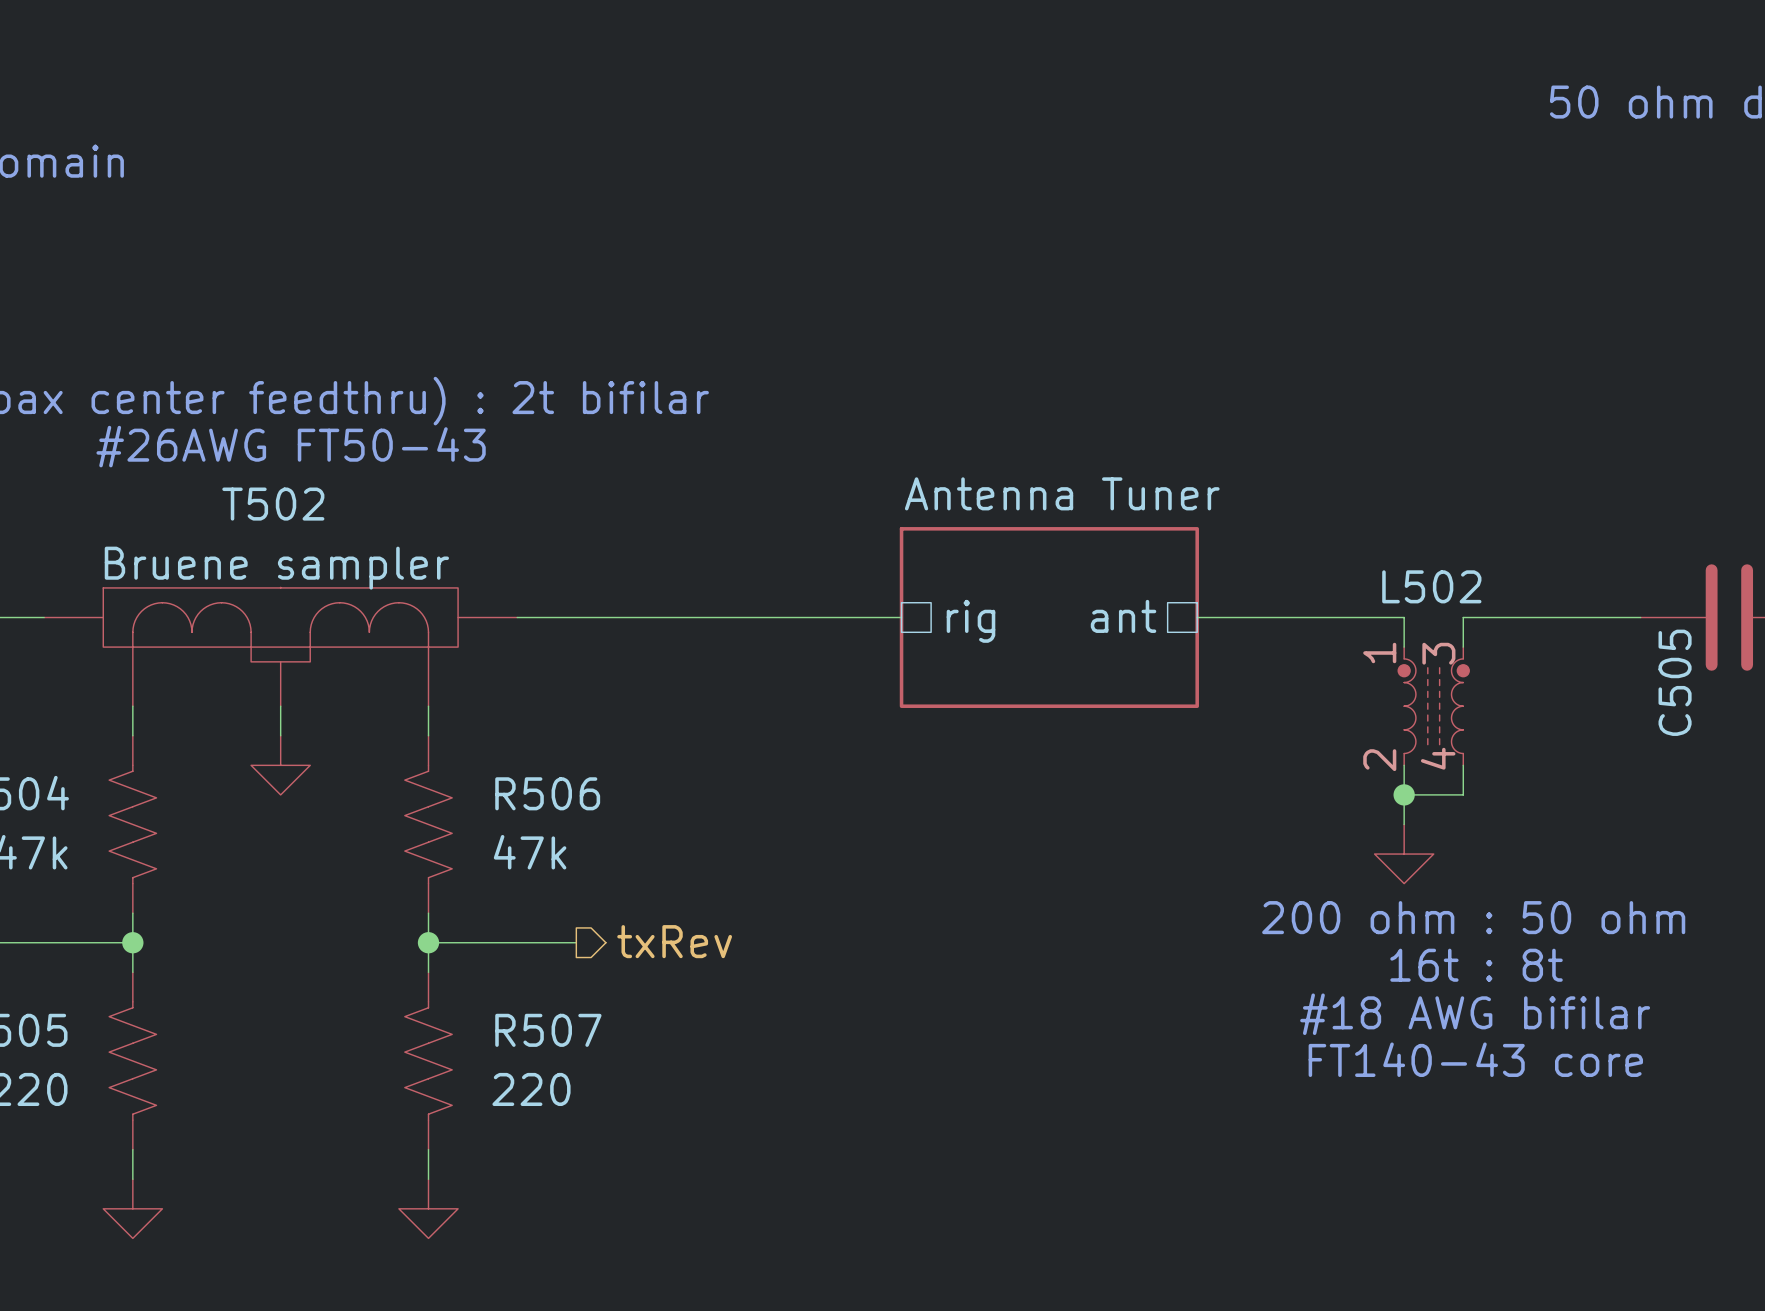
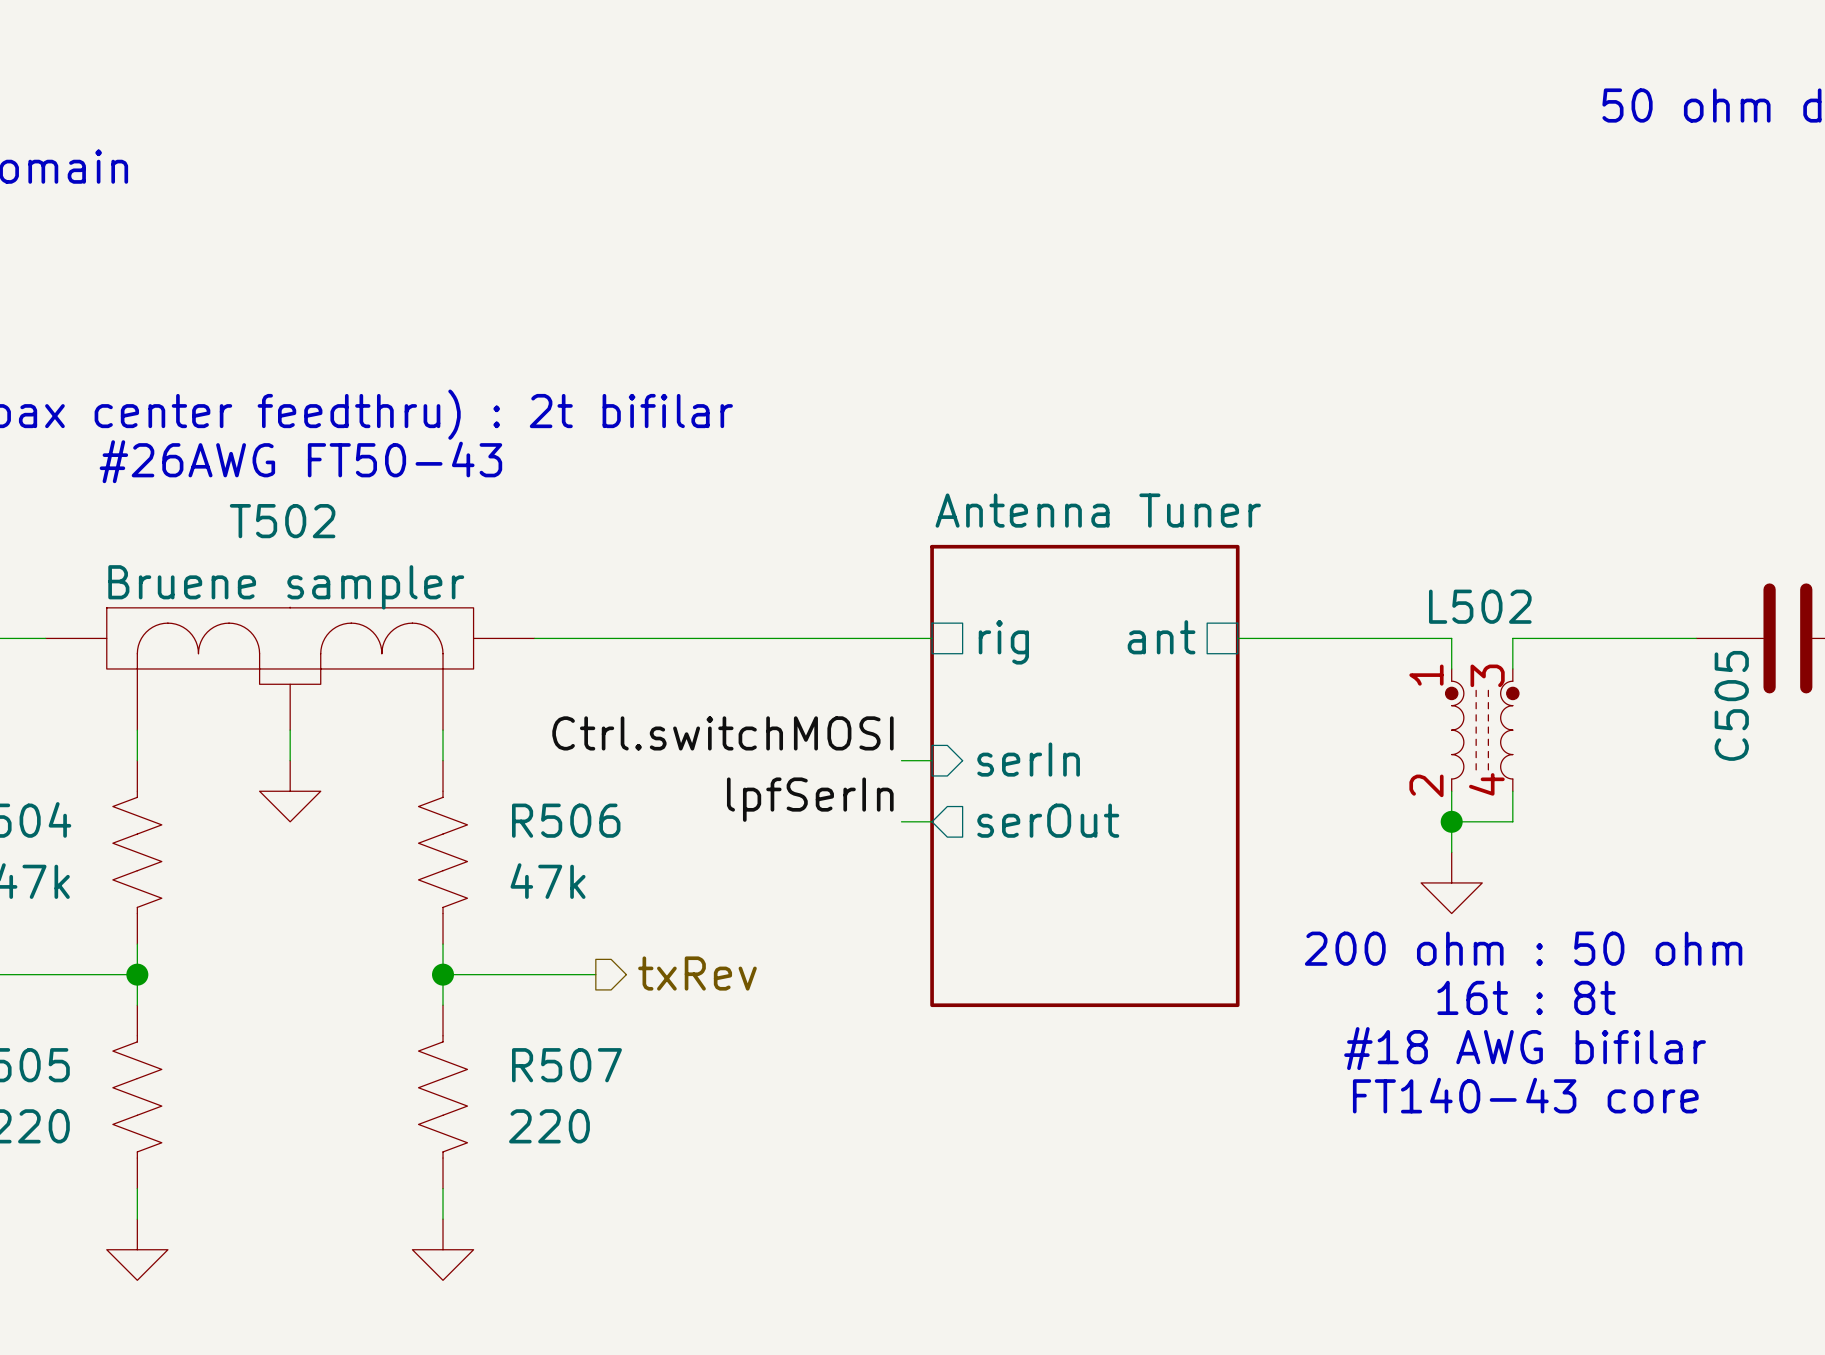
sheet Antenna Tuner: (1049, 617) -> none
label: none -> Ctrl.switchMOSI (722, 733)
sheet pin: none -> serIn (1028, 759)
wire: none -> (901, 760) (932, 760)
sheet Antenna Tuner: none -> (1084, 775)
label: none -> lpfSerIn (810, 799)
sheet pin: none -> serOut (1048, 820)
wire: none -> (901, 821) (932, 821)

